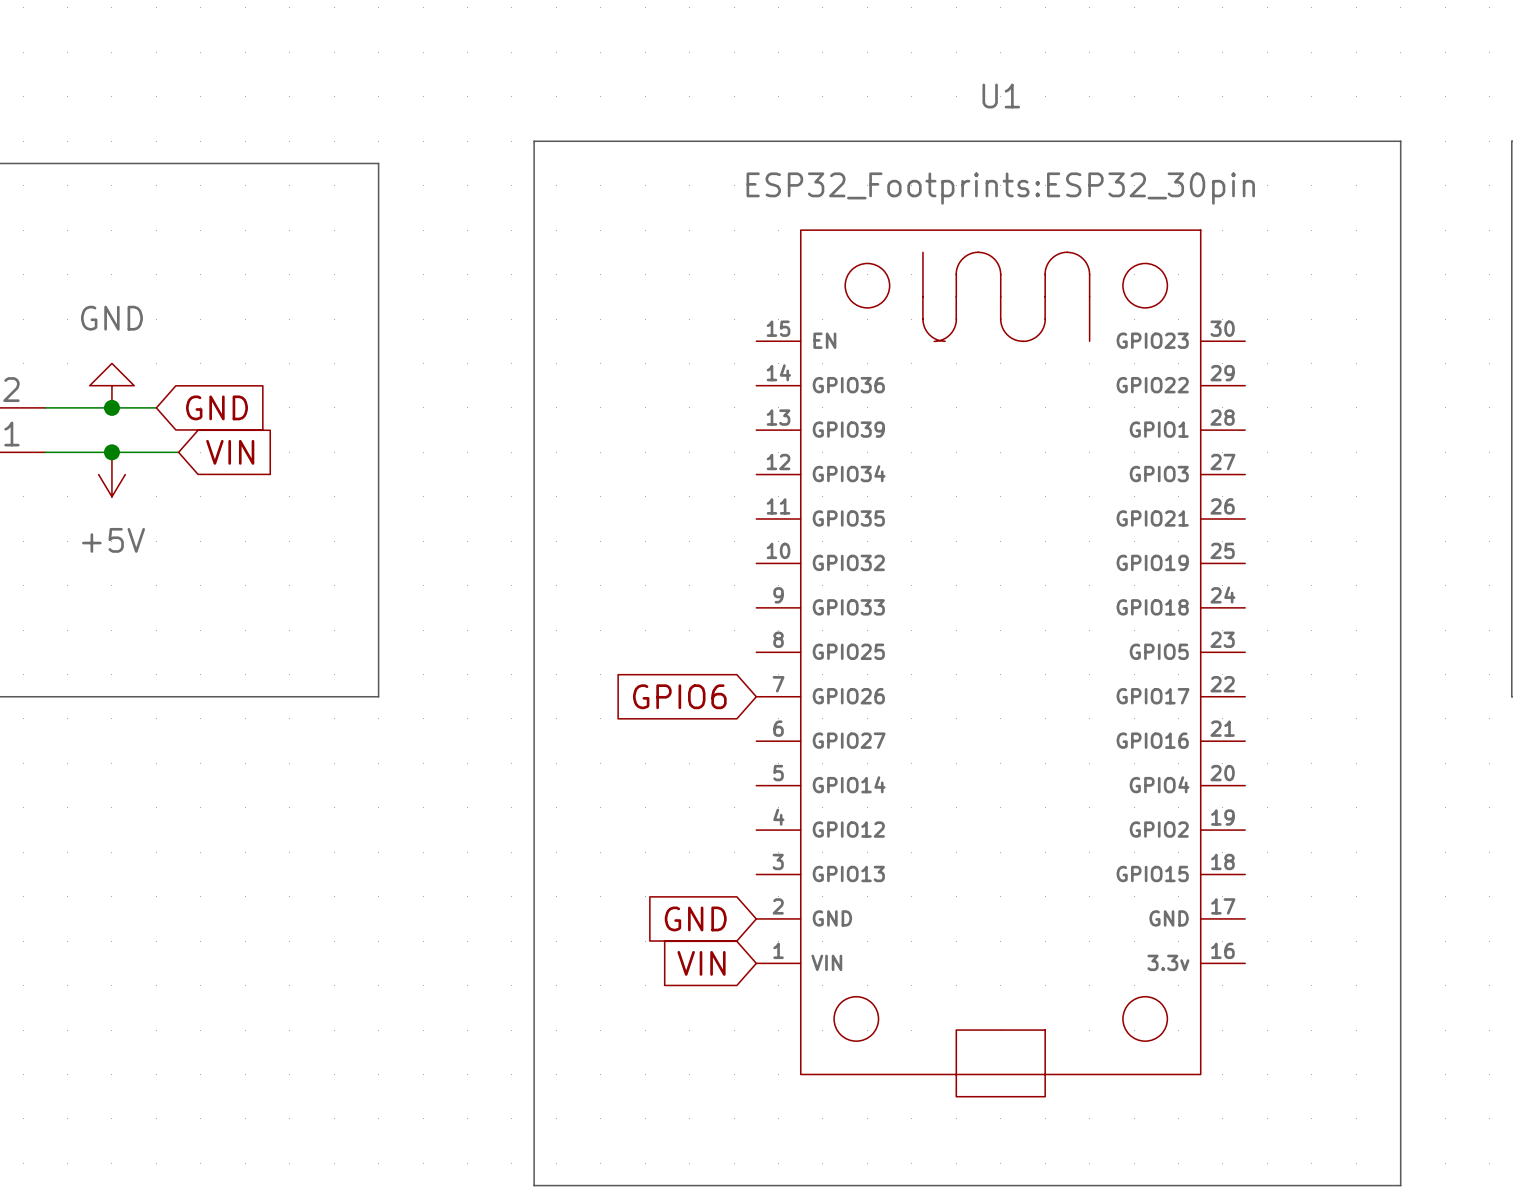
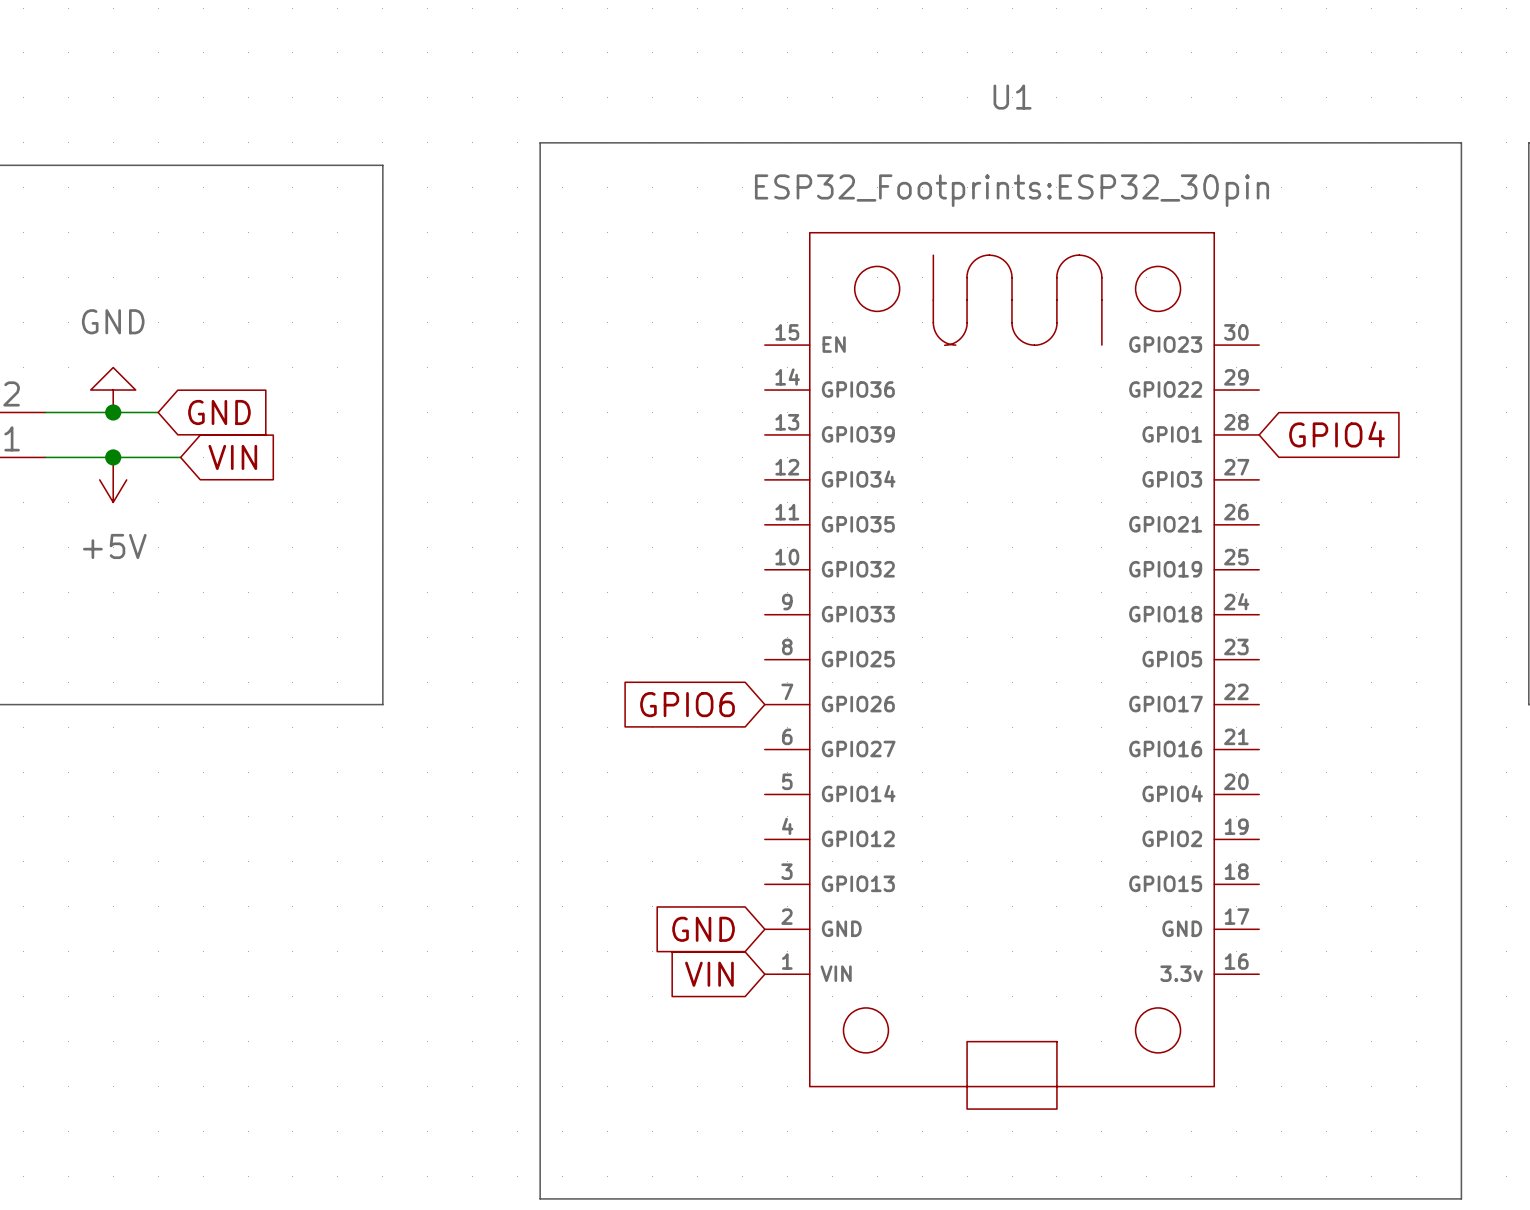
line: (1400, 141) (1400, 1185) -> (1416, 142) (1461, 142) (1461, 1198) (1416, 1198)
global label: none -> GPIO4 (1337, 434)

